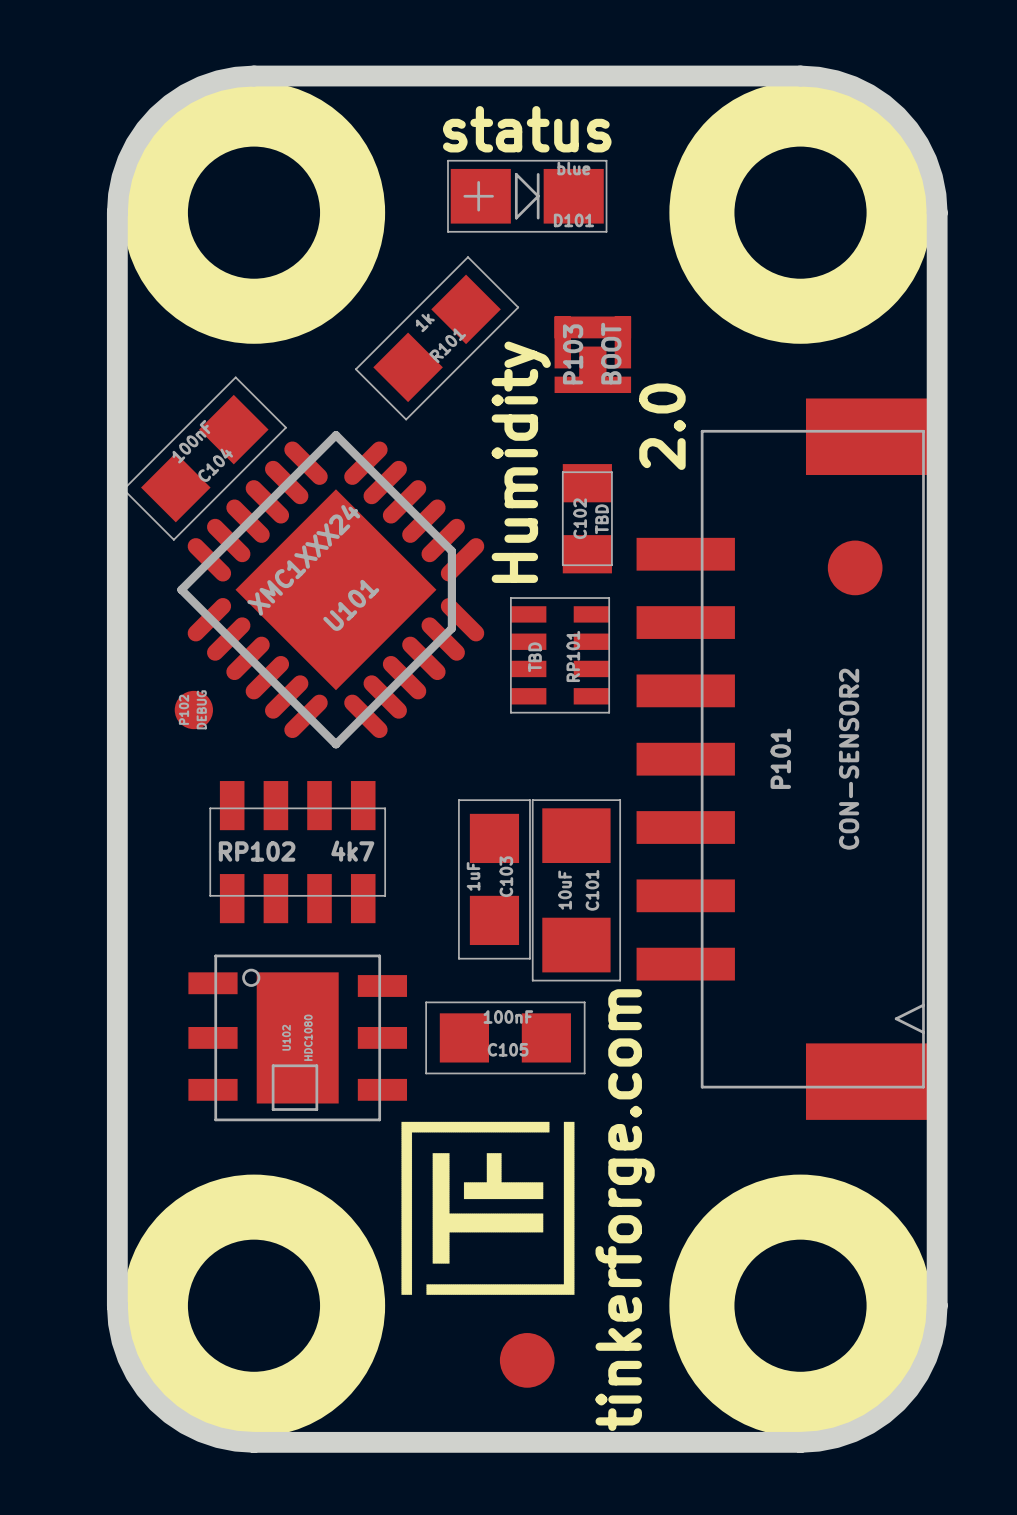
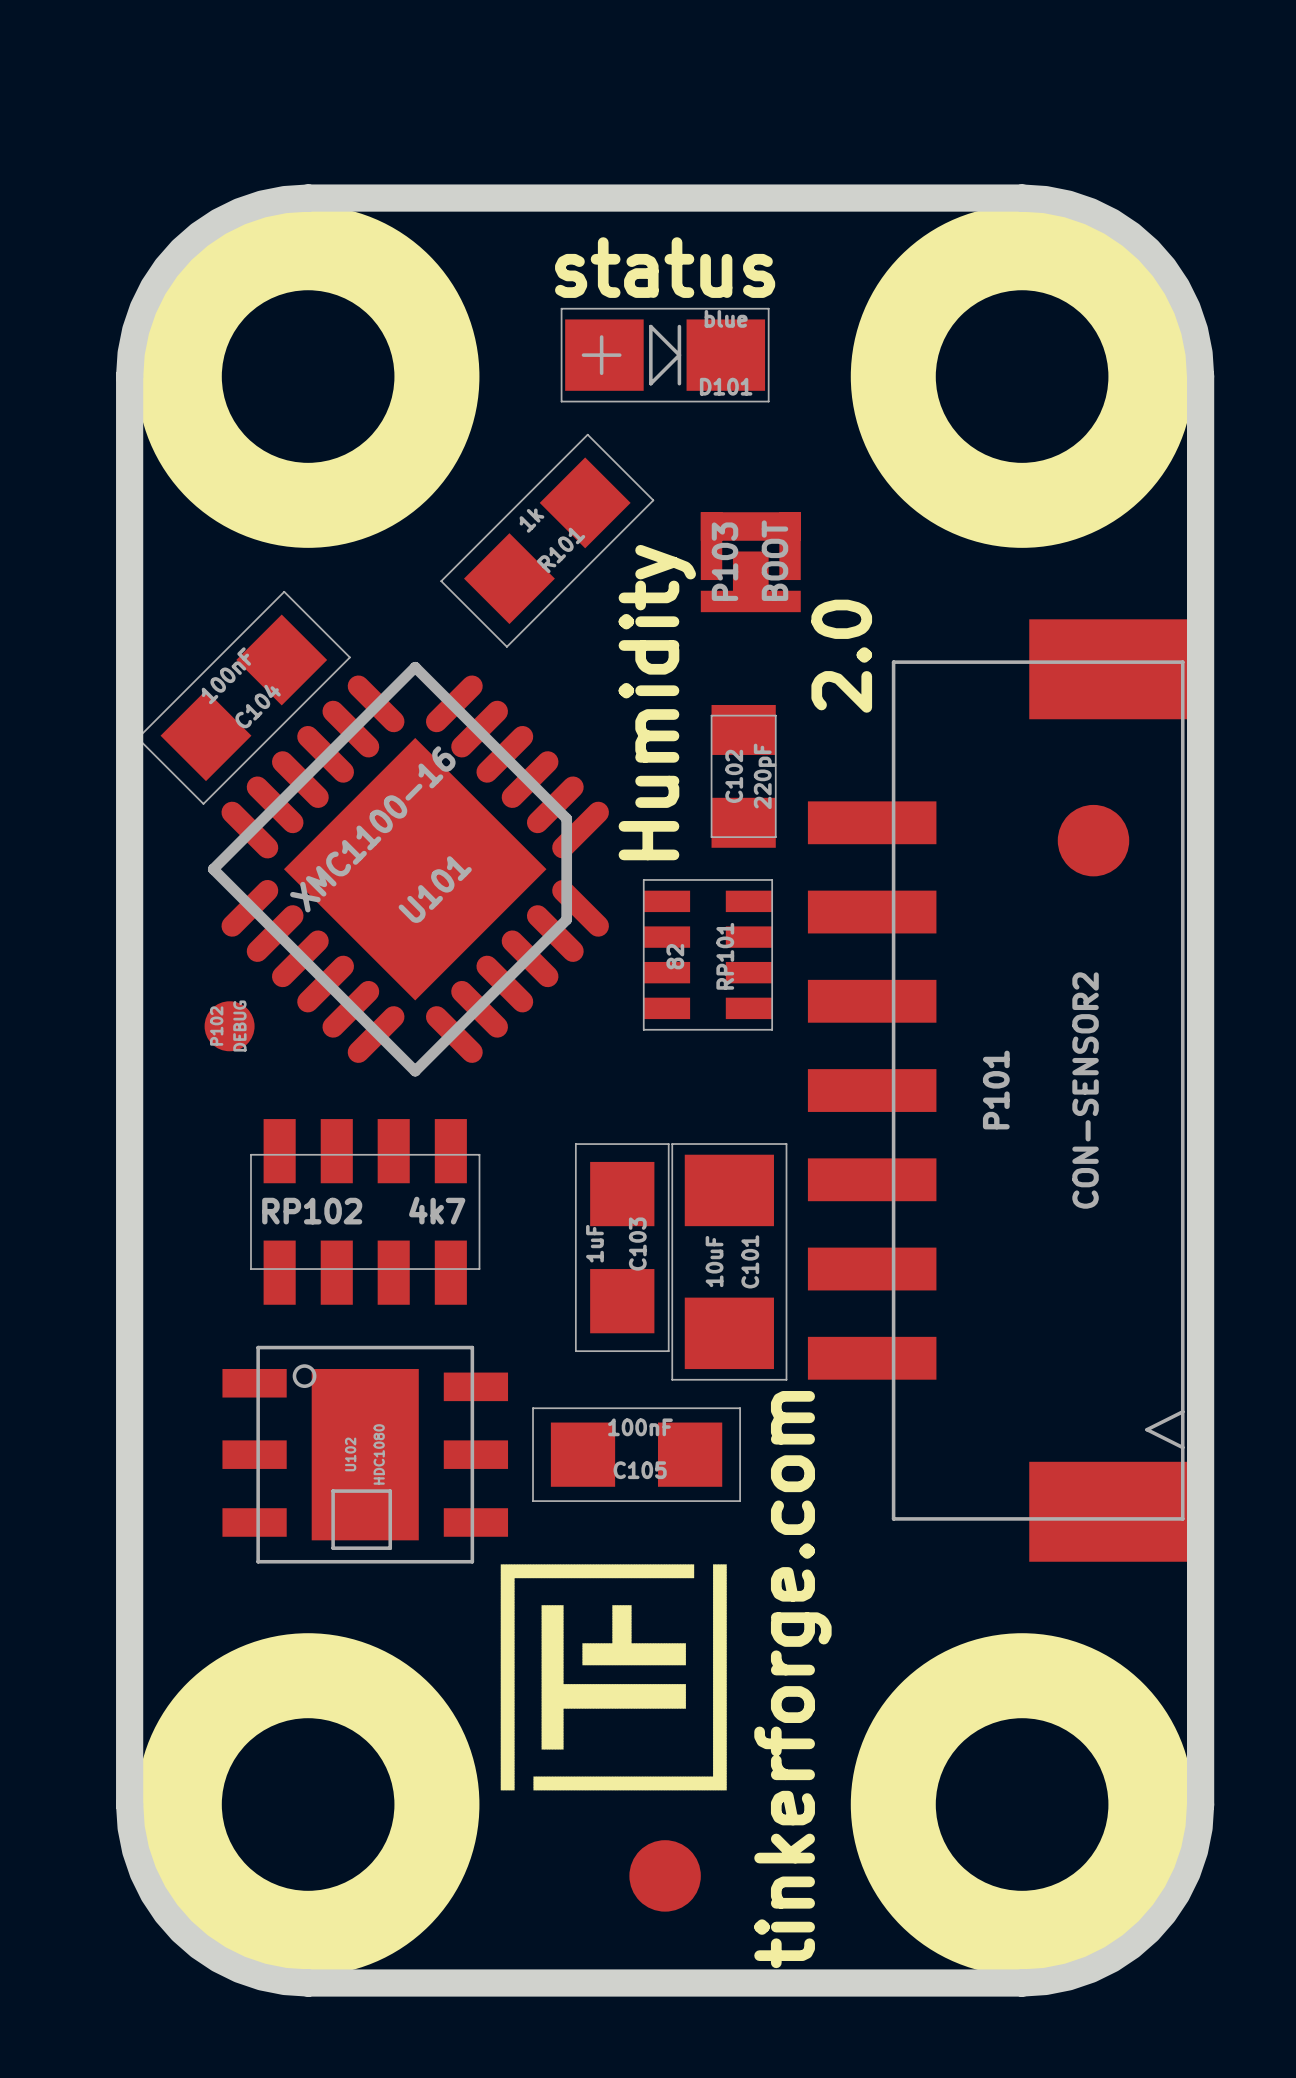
C102 value: TBD (601, 519) -> 220pF (765, 776)
U101 value: XMC1XXX24 (303, 560) -> XMC1100-16 (372, 829)
RP101 value: TBD (535, 657) -> 82 (675, 956)

